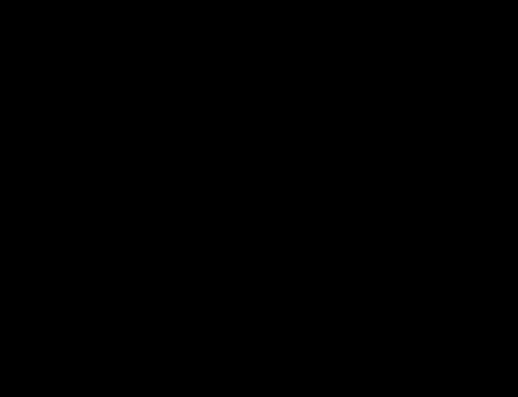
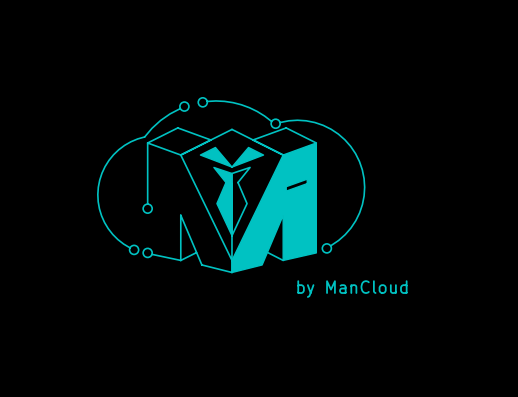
drawing: none -> [97, 97, 366, 274]

